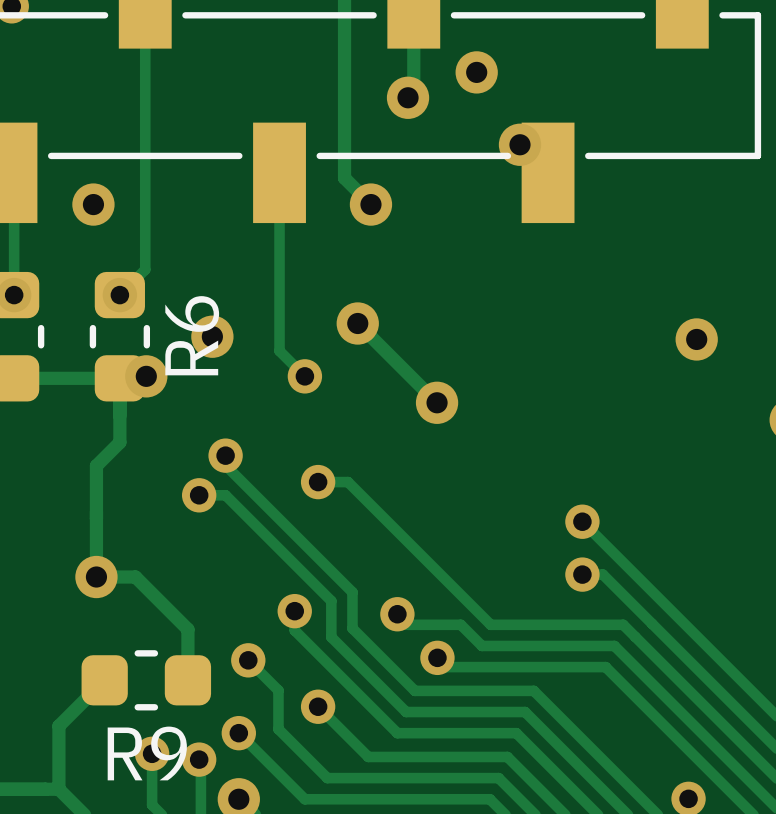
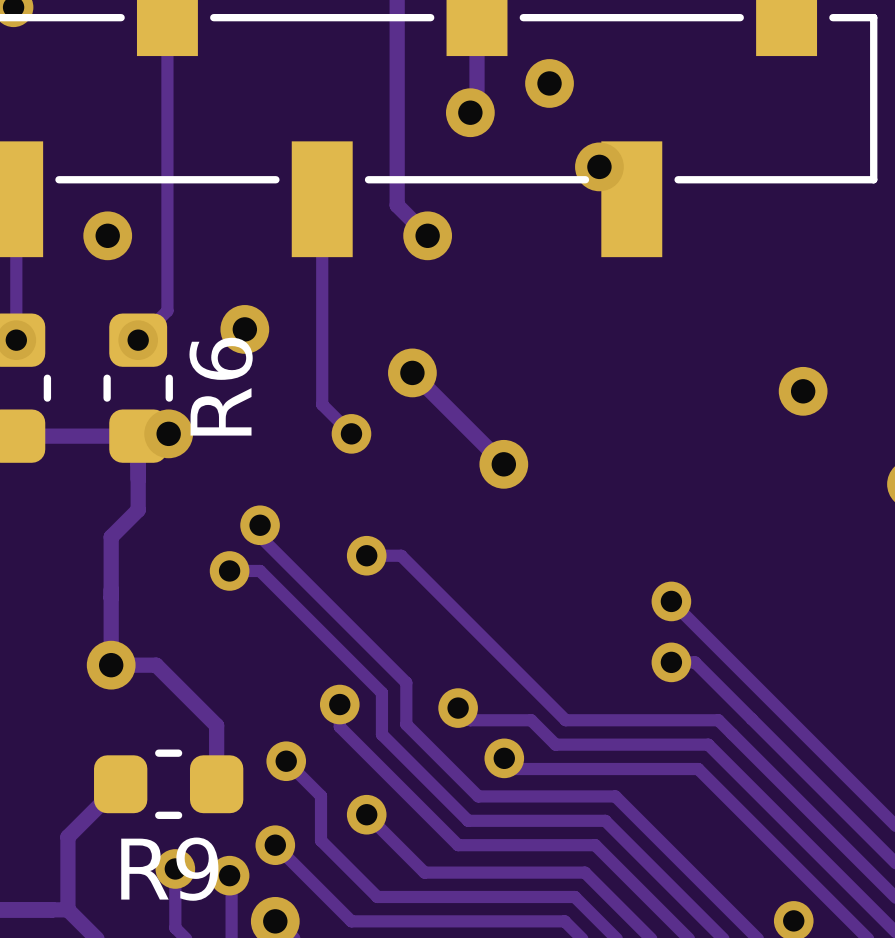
via position: (212, 336) -> (244, 329)

